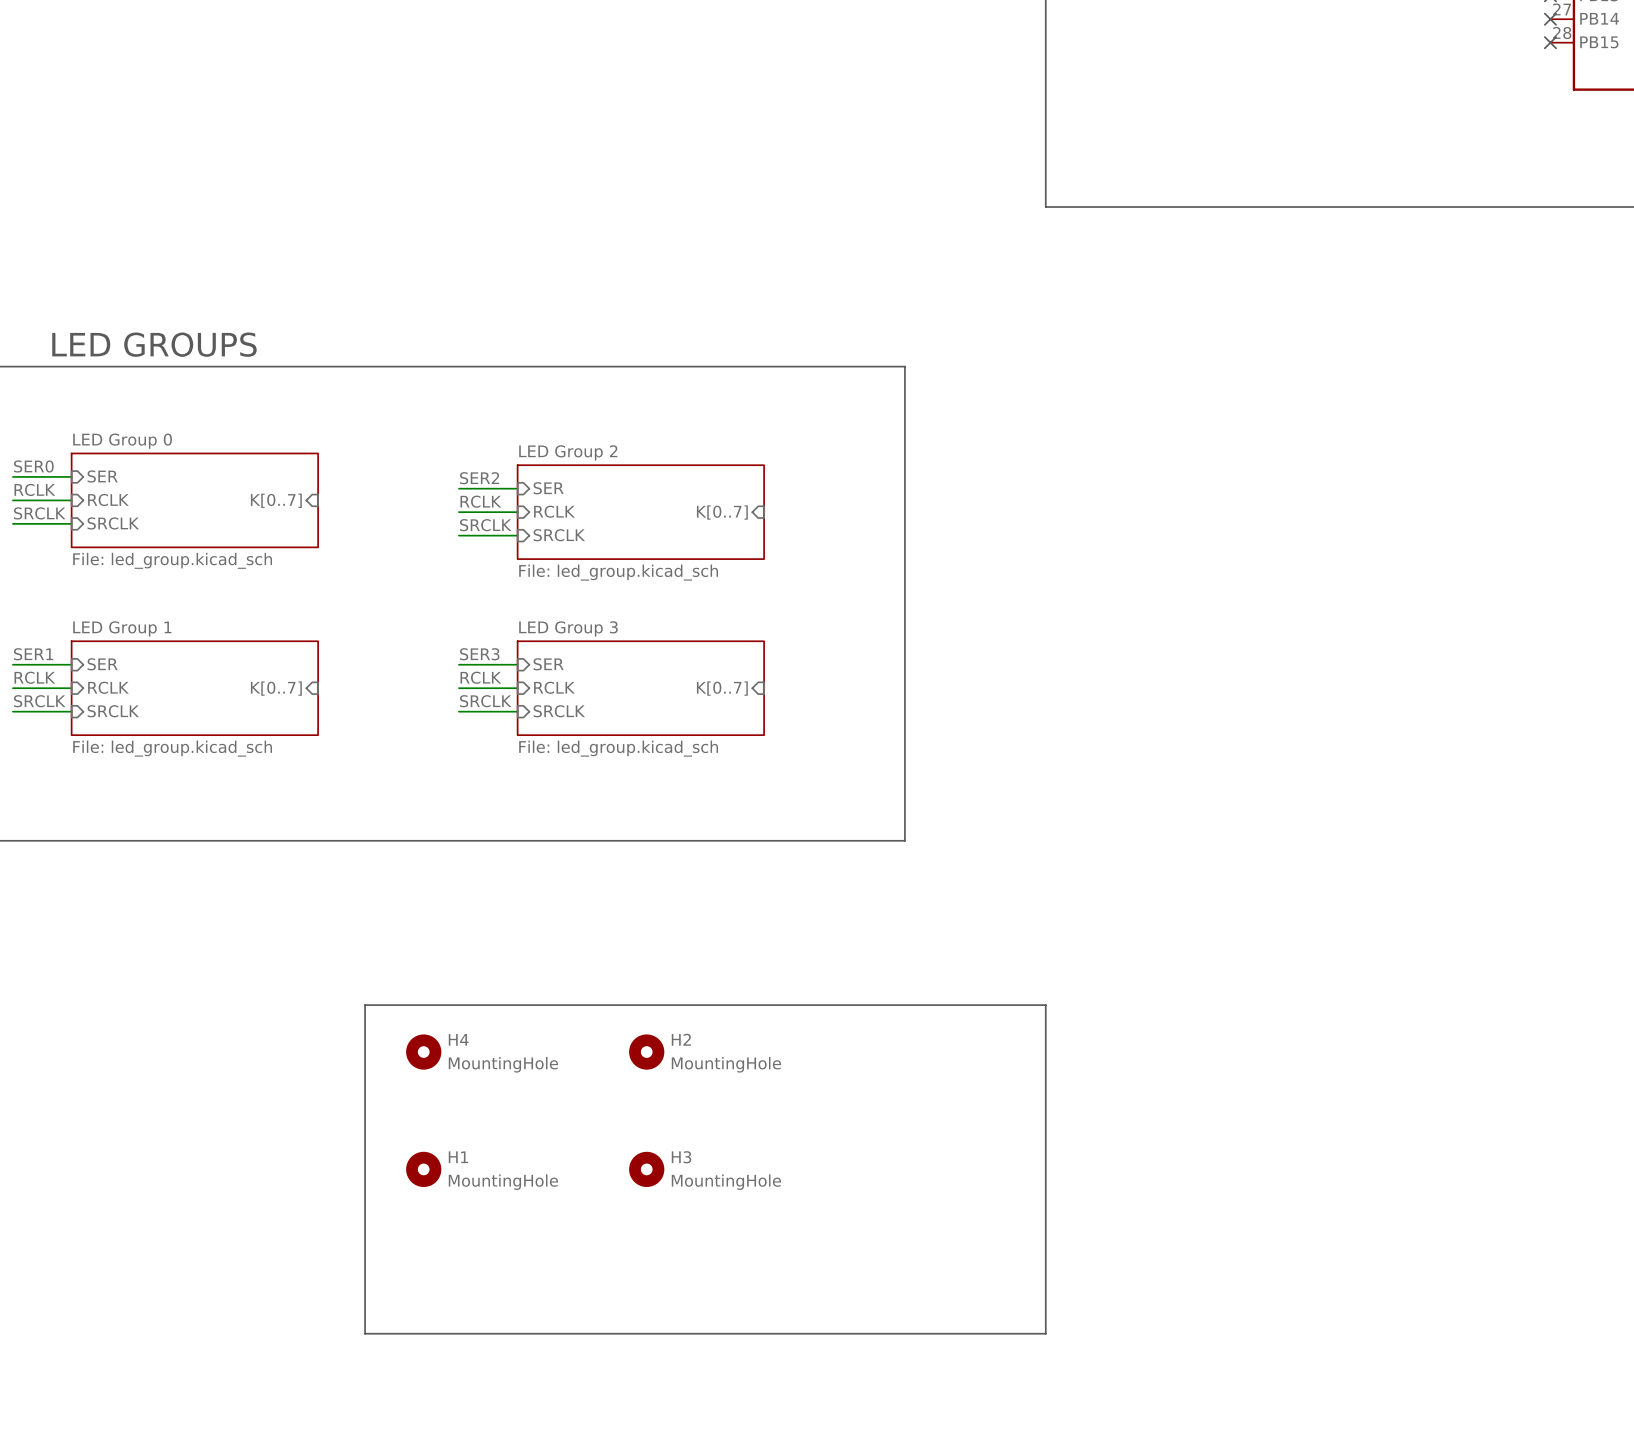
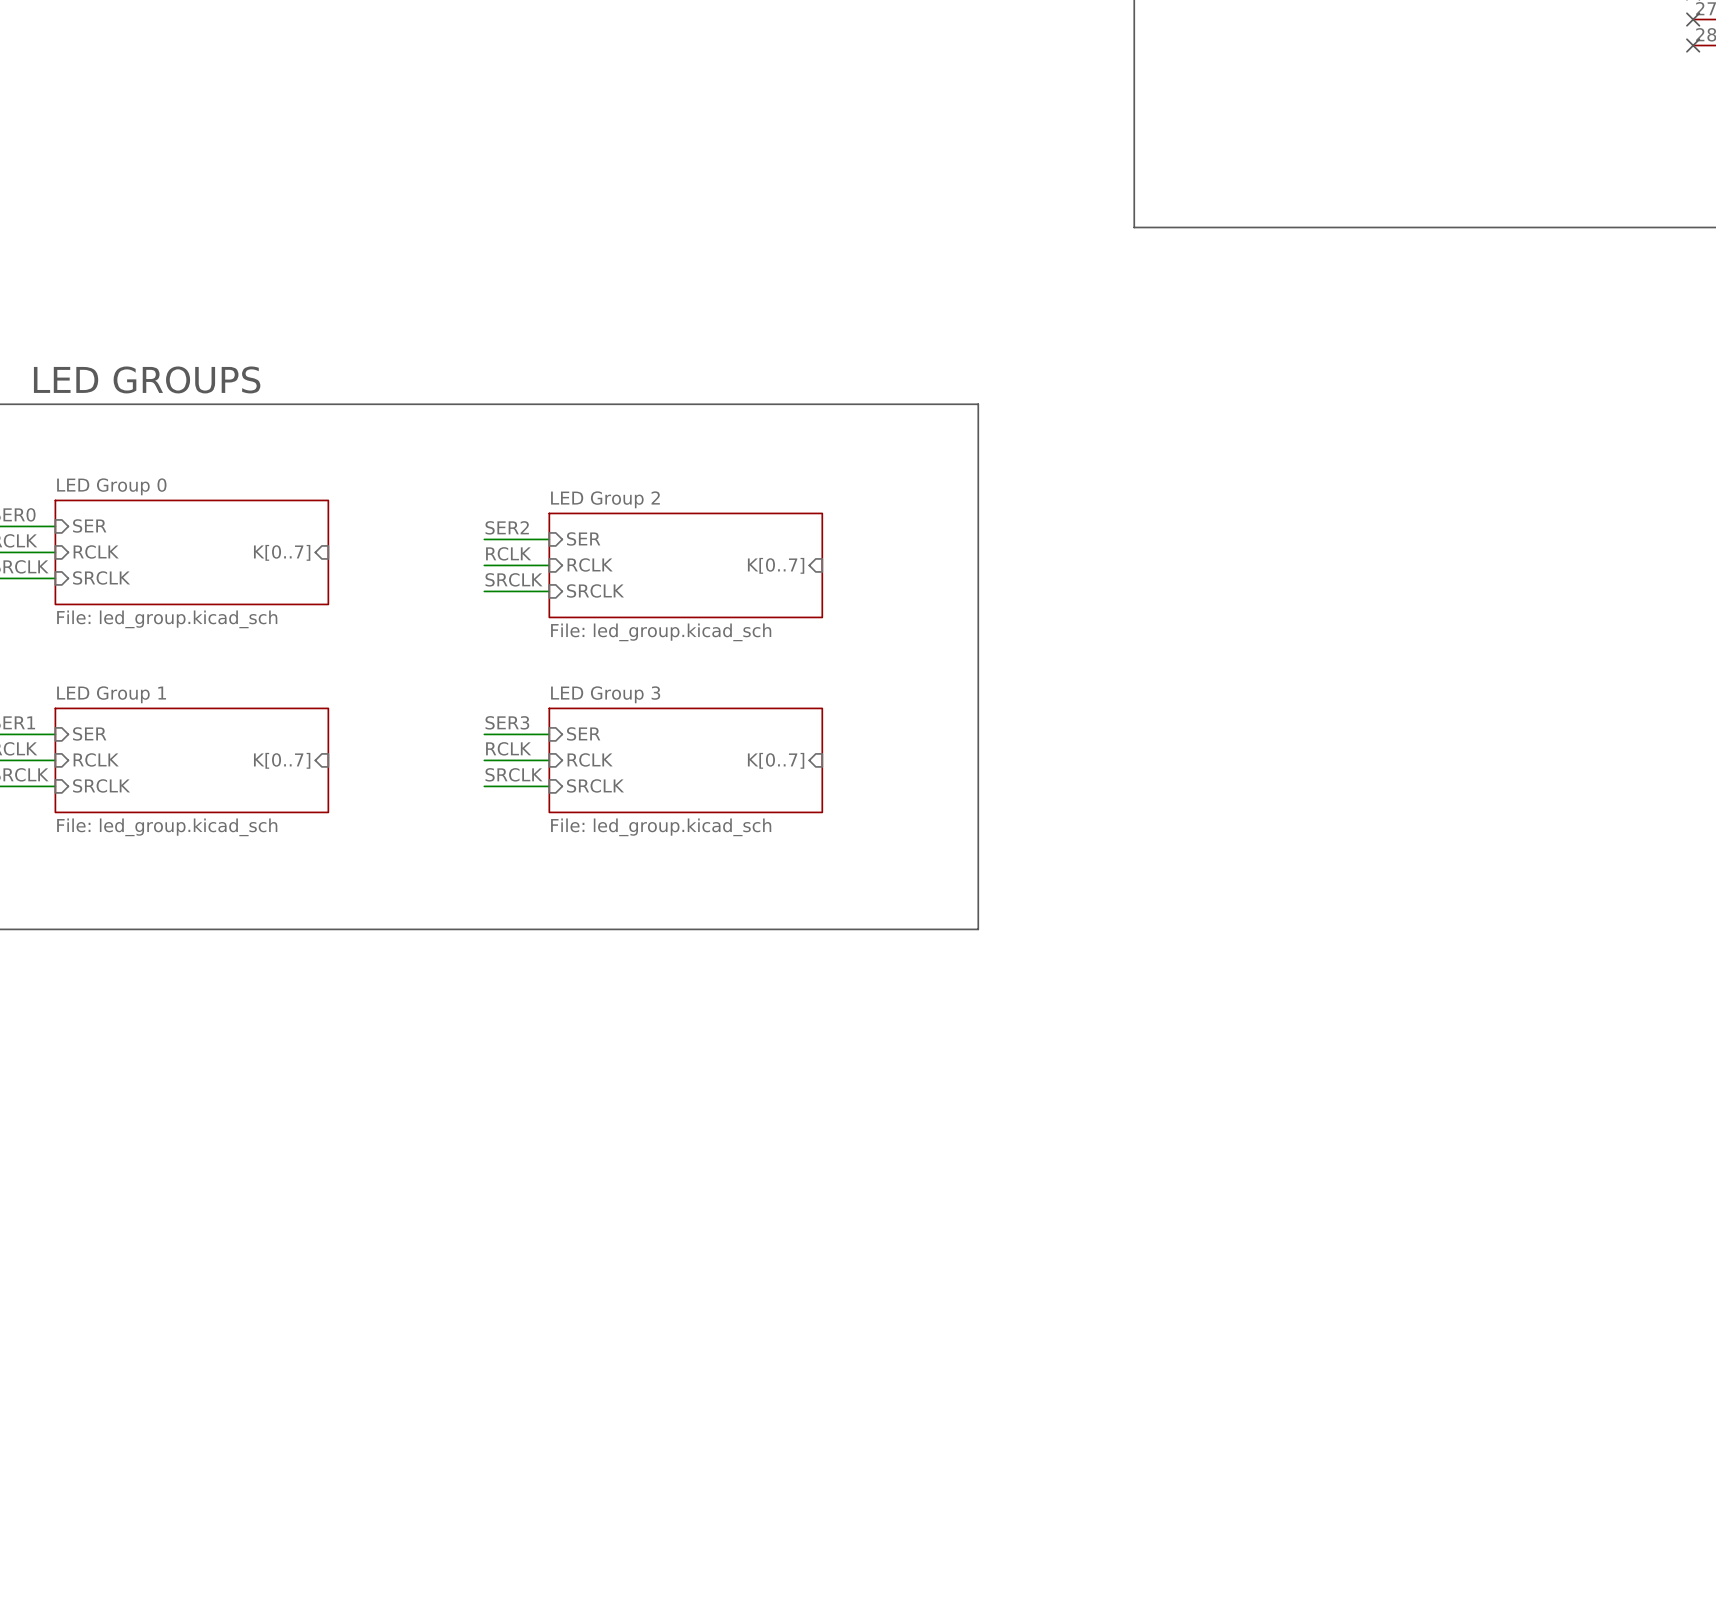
line: (365, 1005) (1045, 1005) (1045, 1333) (365, 1333) (365, 1005) -> none
H4: MountingHole (423, 1052) -> none
H2: MountingHole (646, 1052) -> none
H1: MountingHole (423, 1169) -> none
H3: MountingHole (646, 1169) -> none

